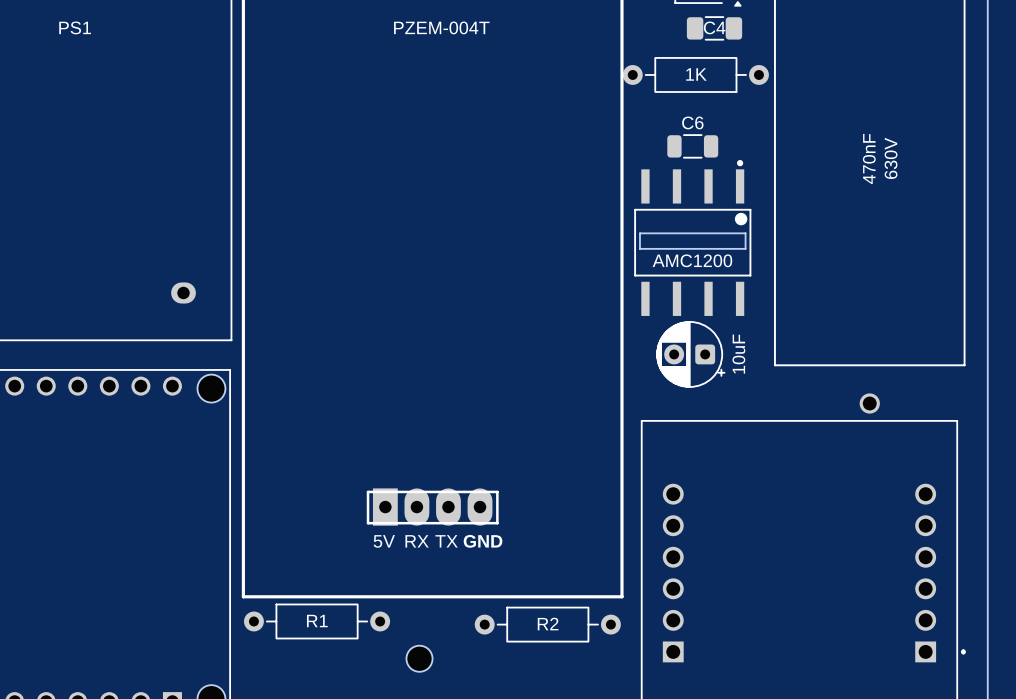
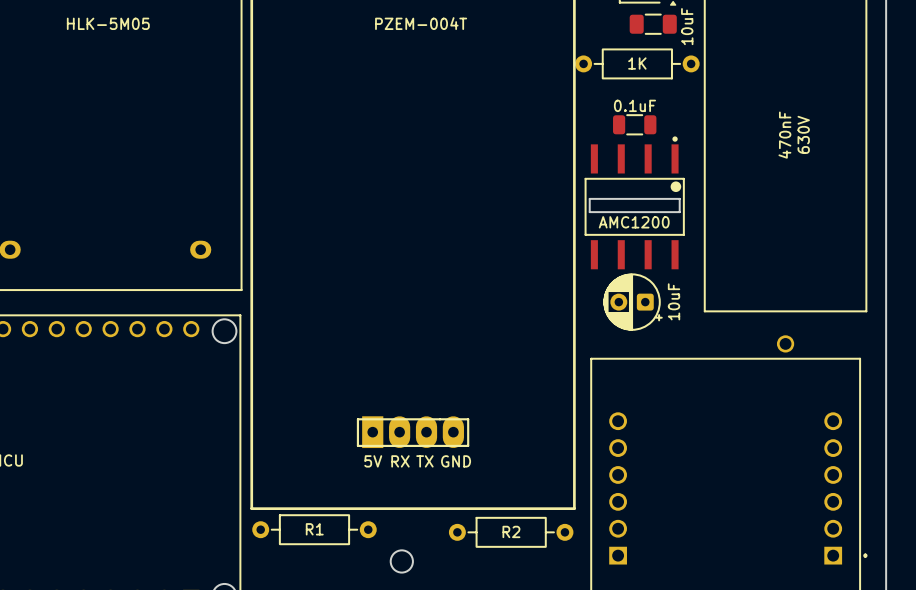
PS1 name: PS1 (75, 27) -> HLK-5M05 (108, 23)
C4 name: C4 (714, 27) -> none
C4 value: none -> 10uF (687, 26)
C6 name: C6 (692, 122) -> none
C6 value: none -> 0.1uF (634, 105)

